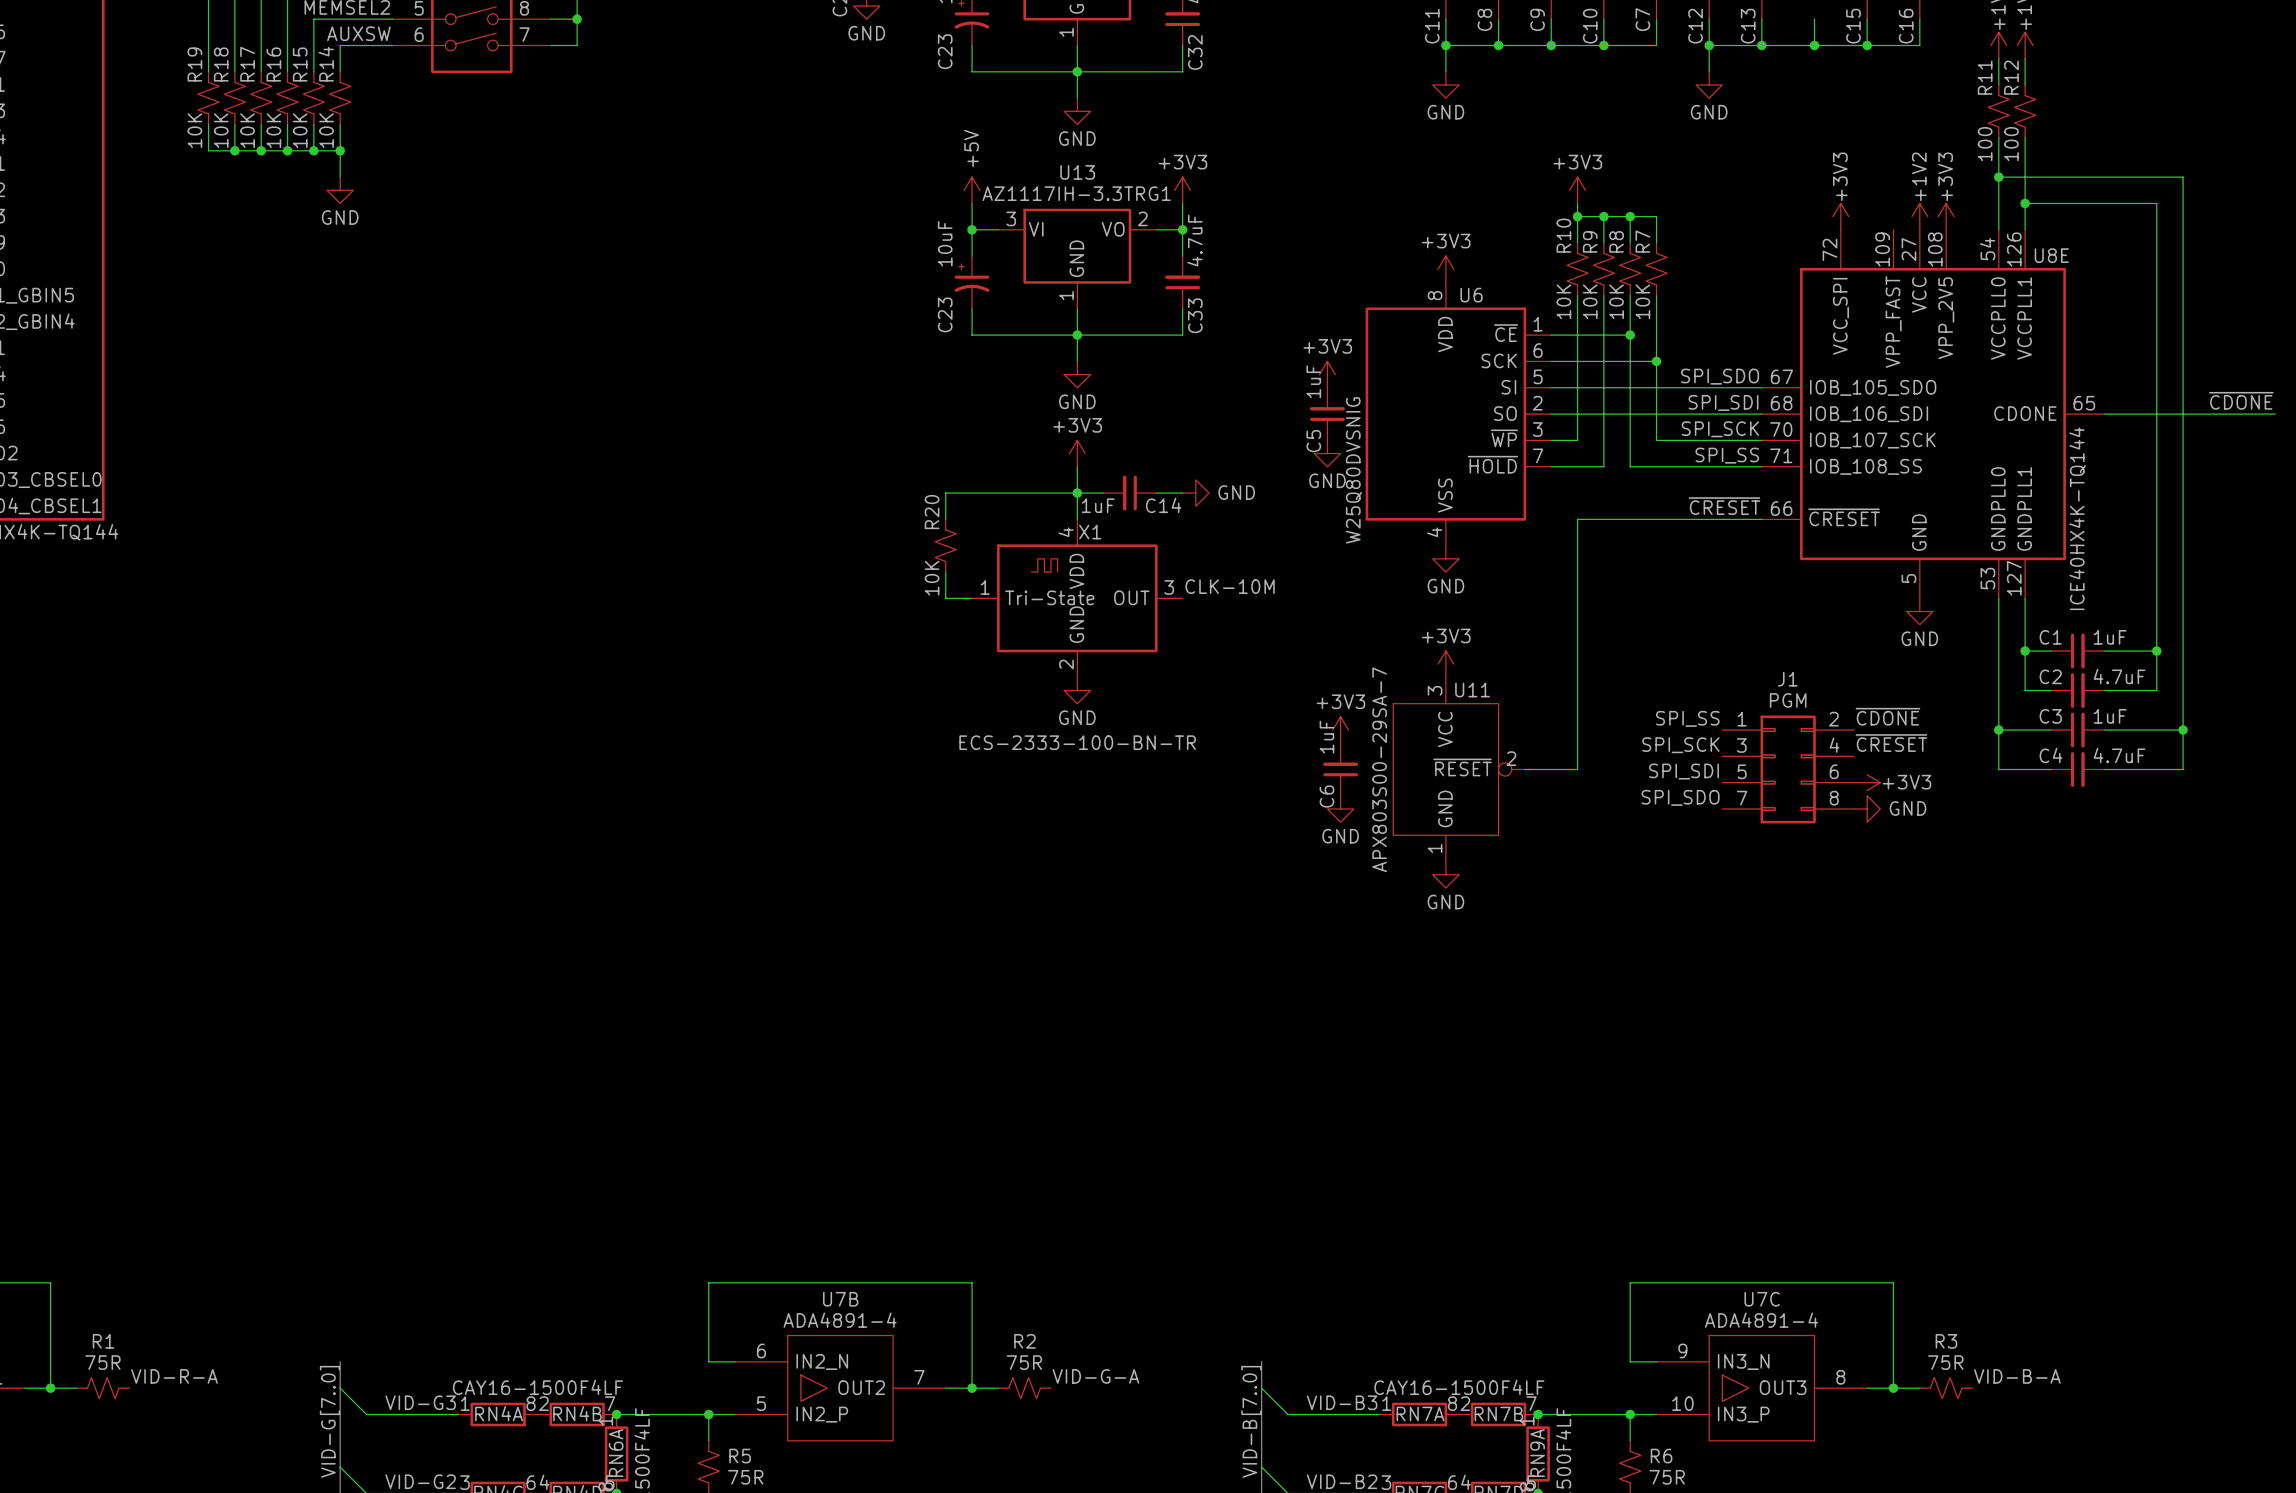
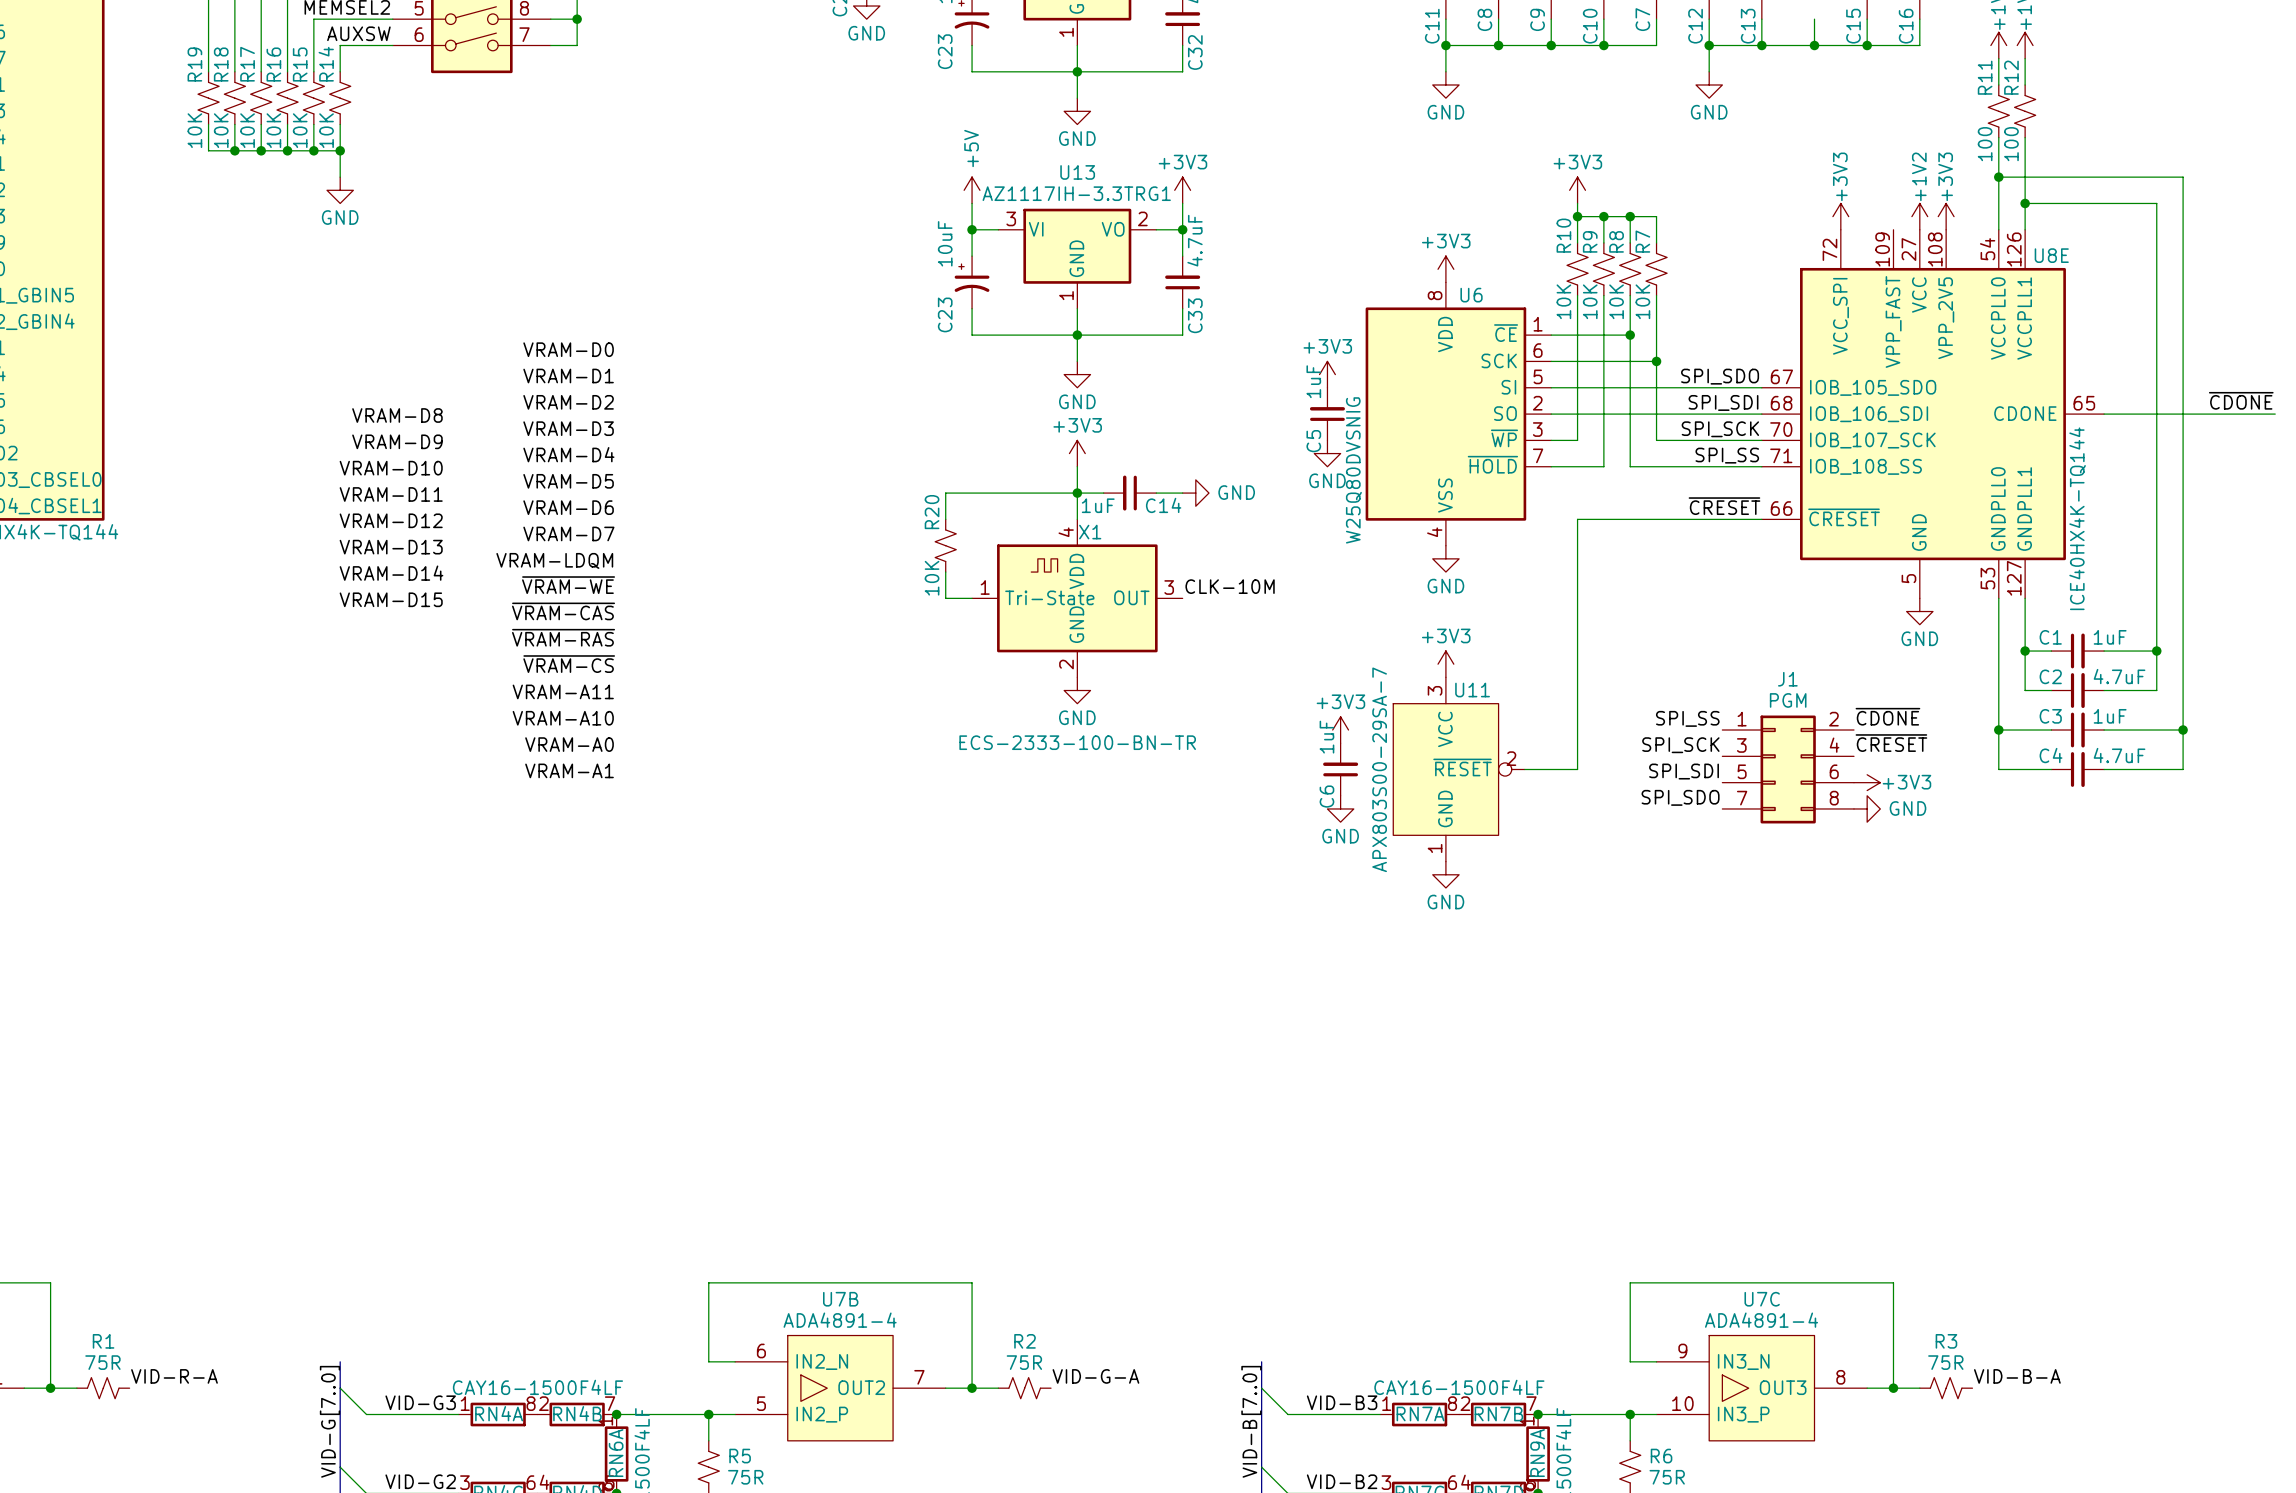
label: none -> VRAM-D0 (568, 349)
label: none -> VRAM-D1 (568, 376)
label: none -> VRAM-D2 (568, 402)
label: none -> VRAM-D8 (397, 415)
label: none -> VRAM-D3 (568, 428)
label: none -> VRAM-D9 (397, 441)
label: none -> VRAM-D4 (568, 454)
label: none -> VRAM-D10 (391, 468)
label: none -> VRAM-D5 (568, 481)
label: none -> VRAM-D11 (391, 494)
label: none -> VRAM-D6 (568, 507)
label: none -> VRAM-D12 (391, 520)
label: none -> VRAM-D7 (568, 533)
label: none -> VRAM-D13 (391, 547)
label: none -> VRAM-LDQM (554, 560)
label: none -> VRAM-D14 (391, 573)
label: none -> ~{VRAM-WE} (568, 585)
label: none -> VRAM-D15 (391, 599)
label: none -> ~{VRAM-CAS} (563, 611)
label: none -> ~{VRAM-RAS} (563, 637)
label: none -> ~{VRAM-CS} (569, 664)
label: none -> VRAM-A11 (563, 691)
label: none -> VRAM-A10 (563, 718)
label: none -> VRAM-A0 (569, 744)
label: none -> VRAM-A1 (569, 770)

